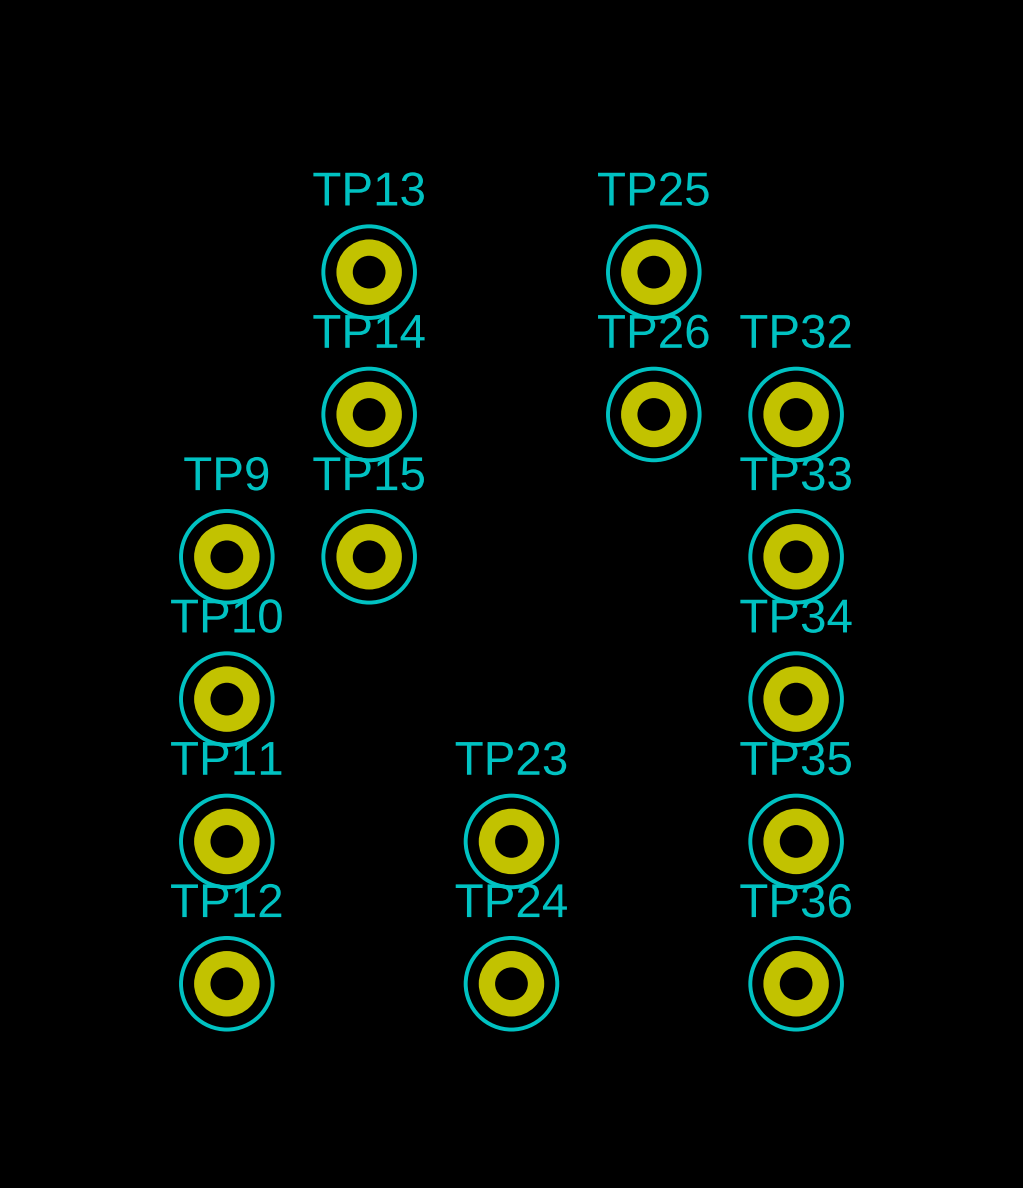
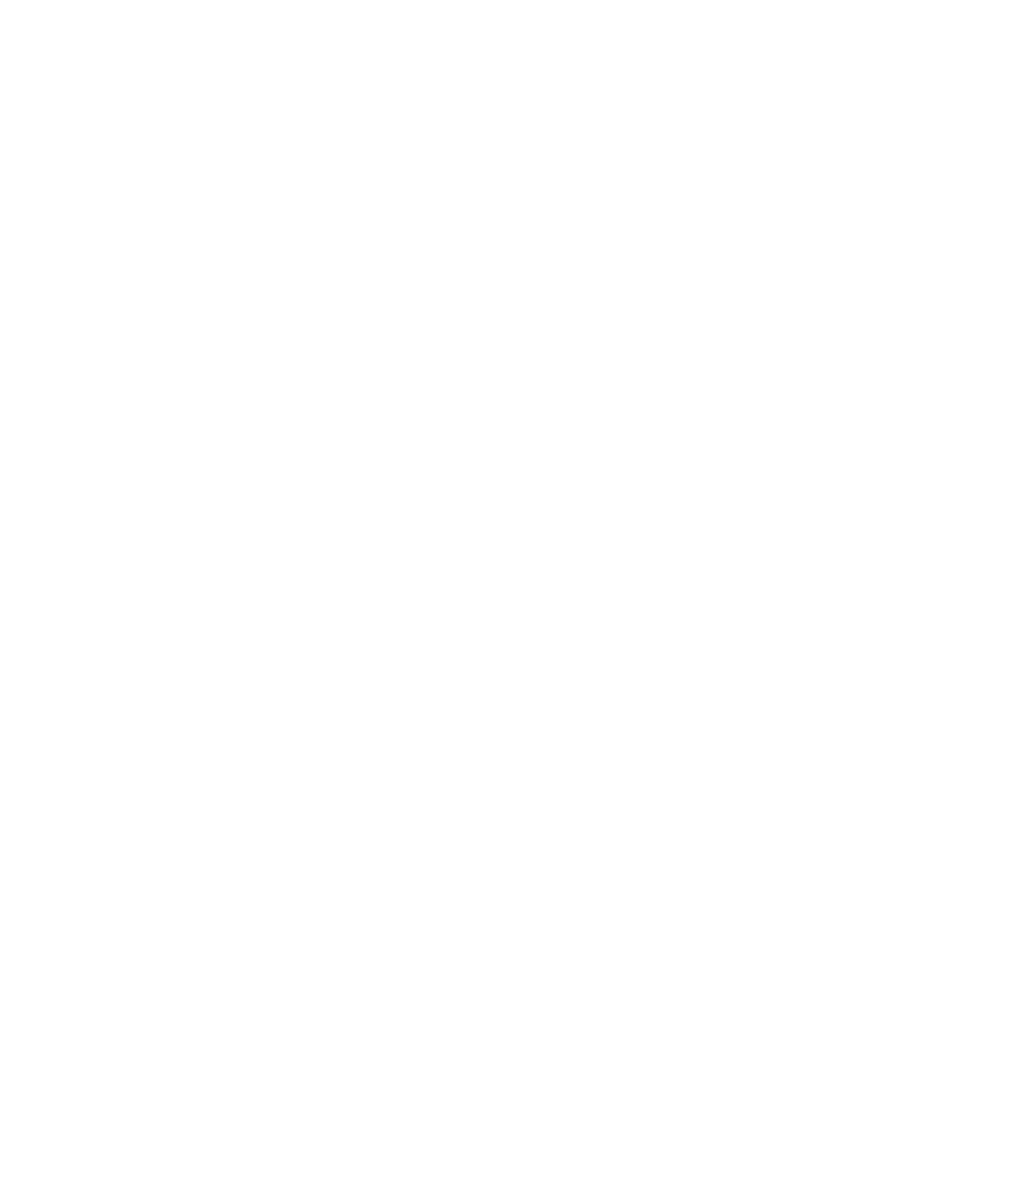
TP13: (369, 272) -> none
TP25: (653, 272) -> none
TP14: (369, 414) -> none
TP26: (653, 414) -> none
TP32: (796, 414) -> none
TP9: (226, 556) -> none
TP15: (369, 556) -> none
TP33: (796, 556) -> none
TP10: (226, 699) -> none
TP34: (796, 699) -> none
TP11: (226, 841) -> none
TP23: (511, 841) -> none
TP35: (796, 841) -> none
TP12: (226, 983) -> none
TP24: (511, 983) -> none
TP36: (796, 983) -> none

